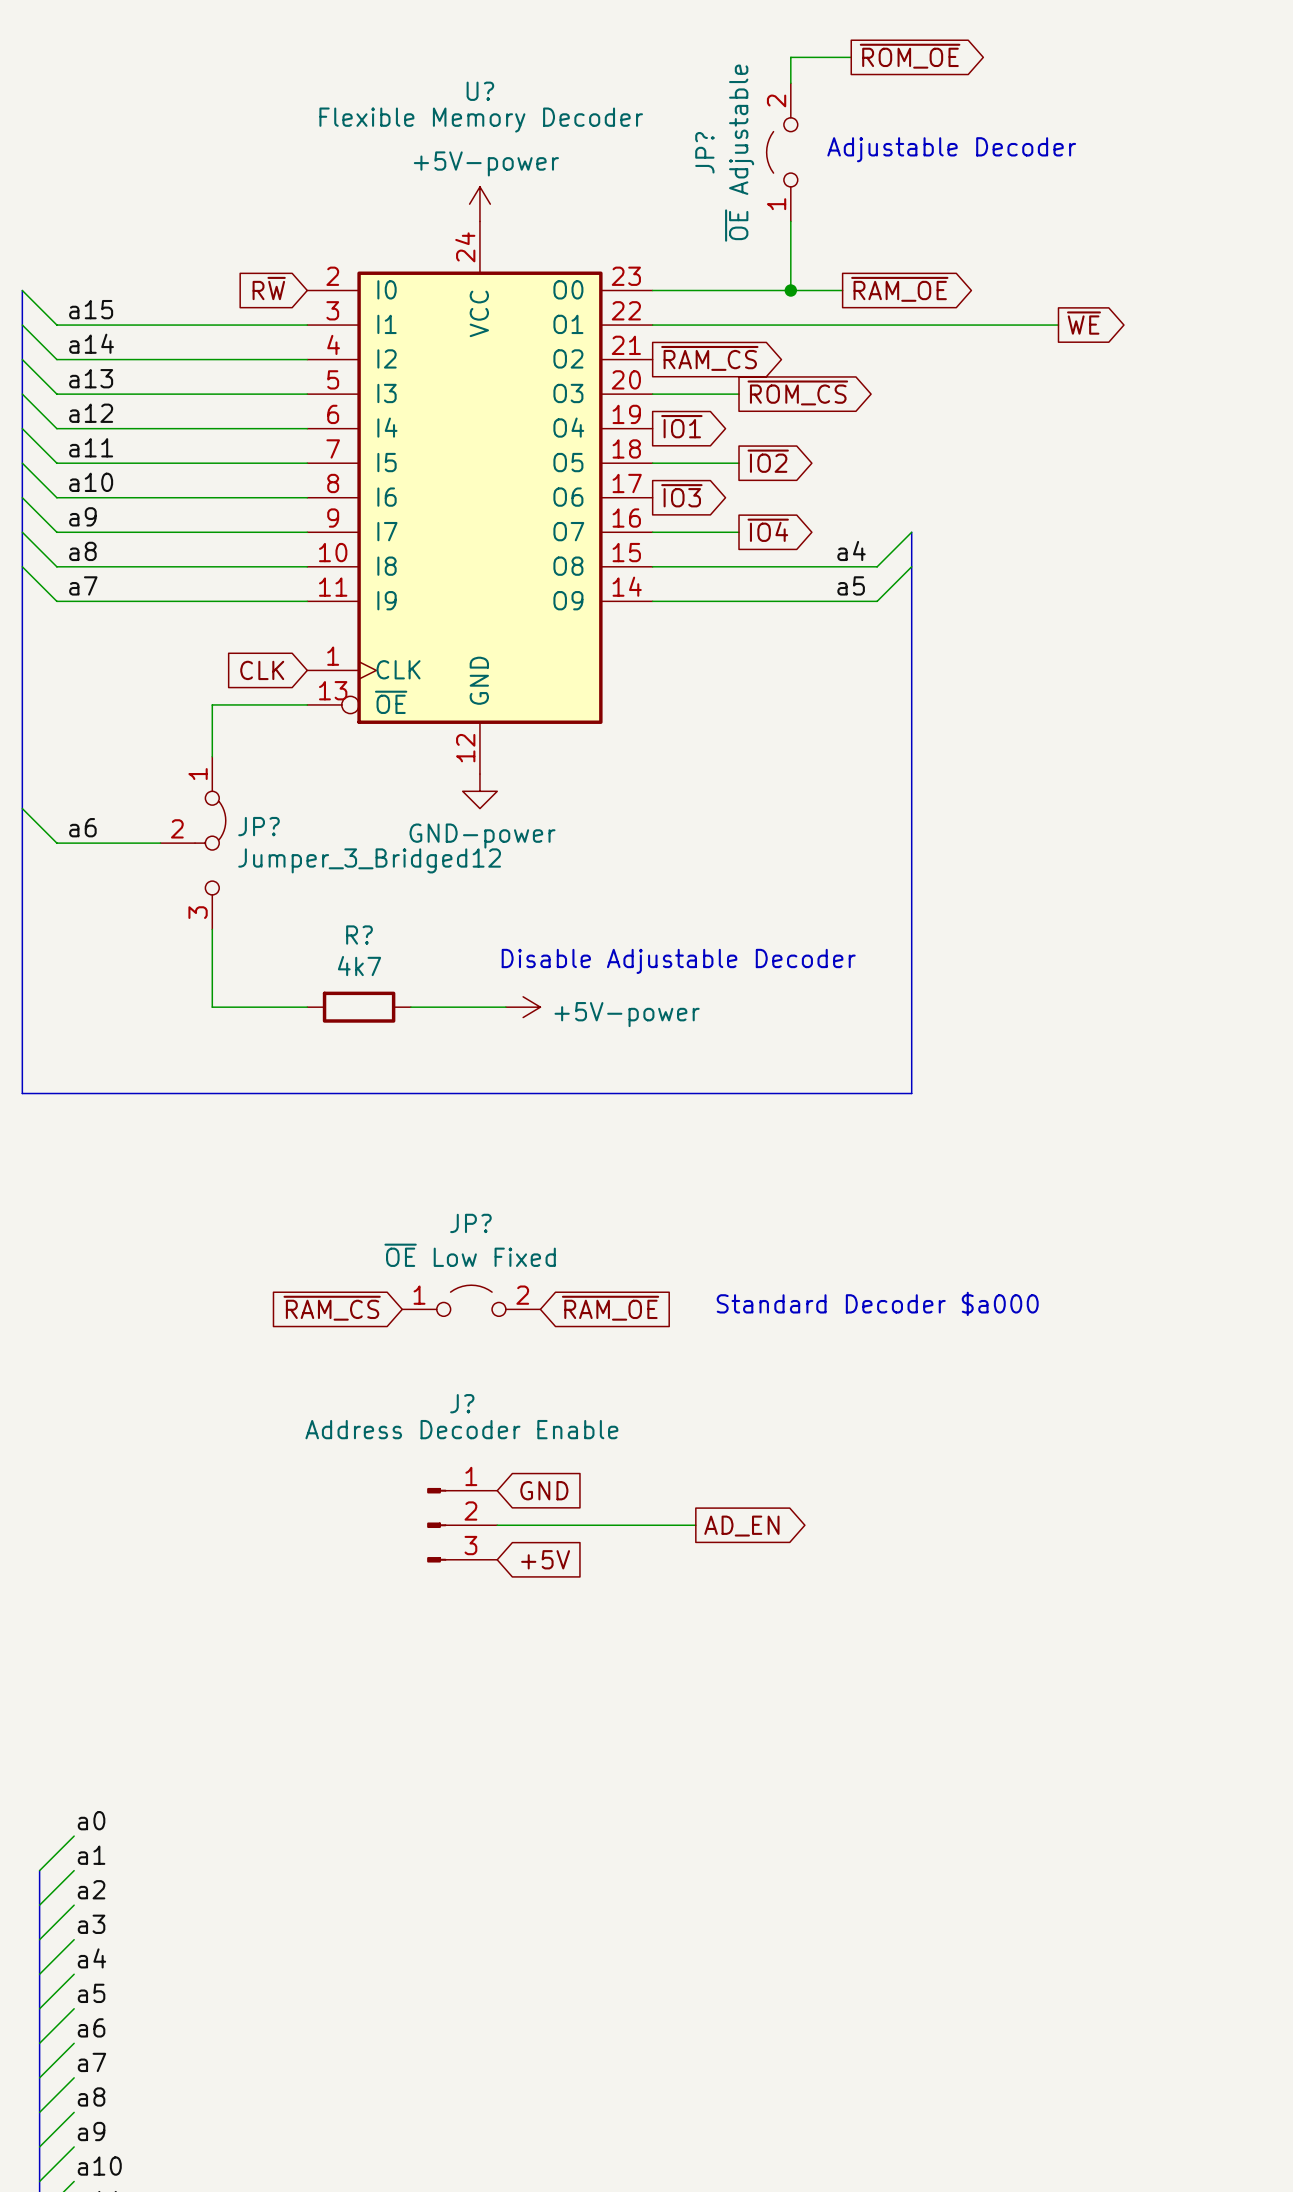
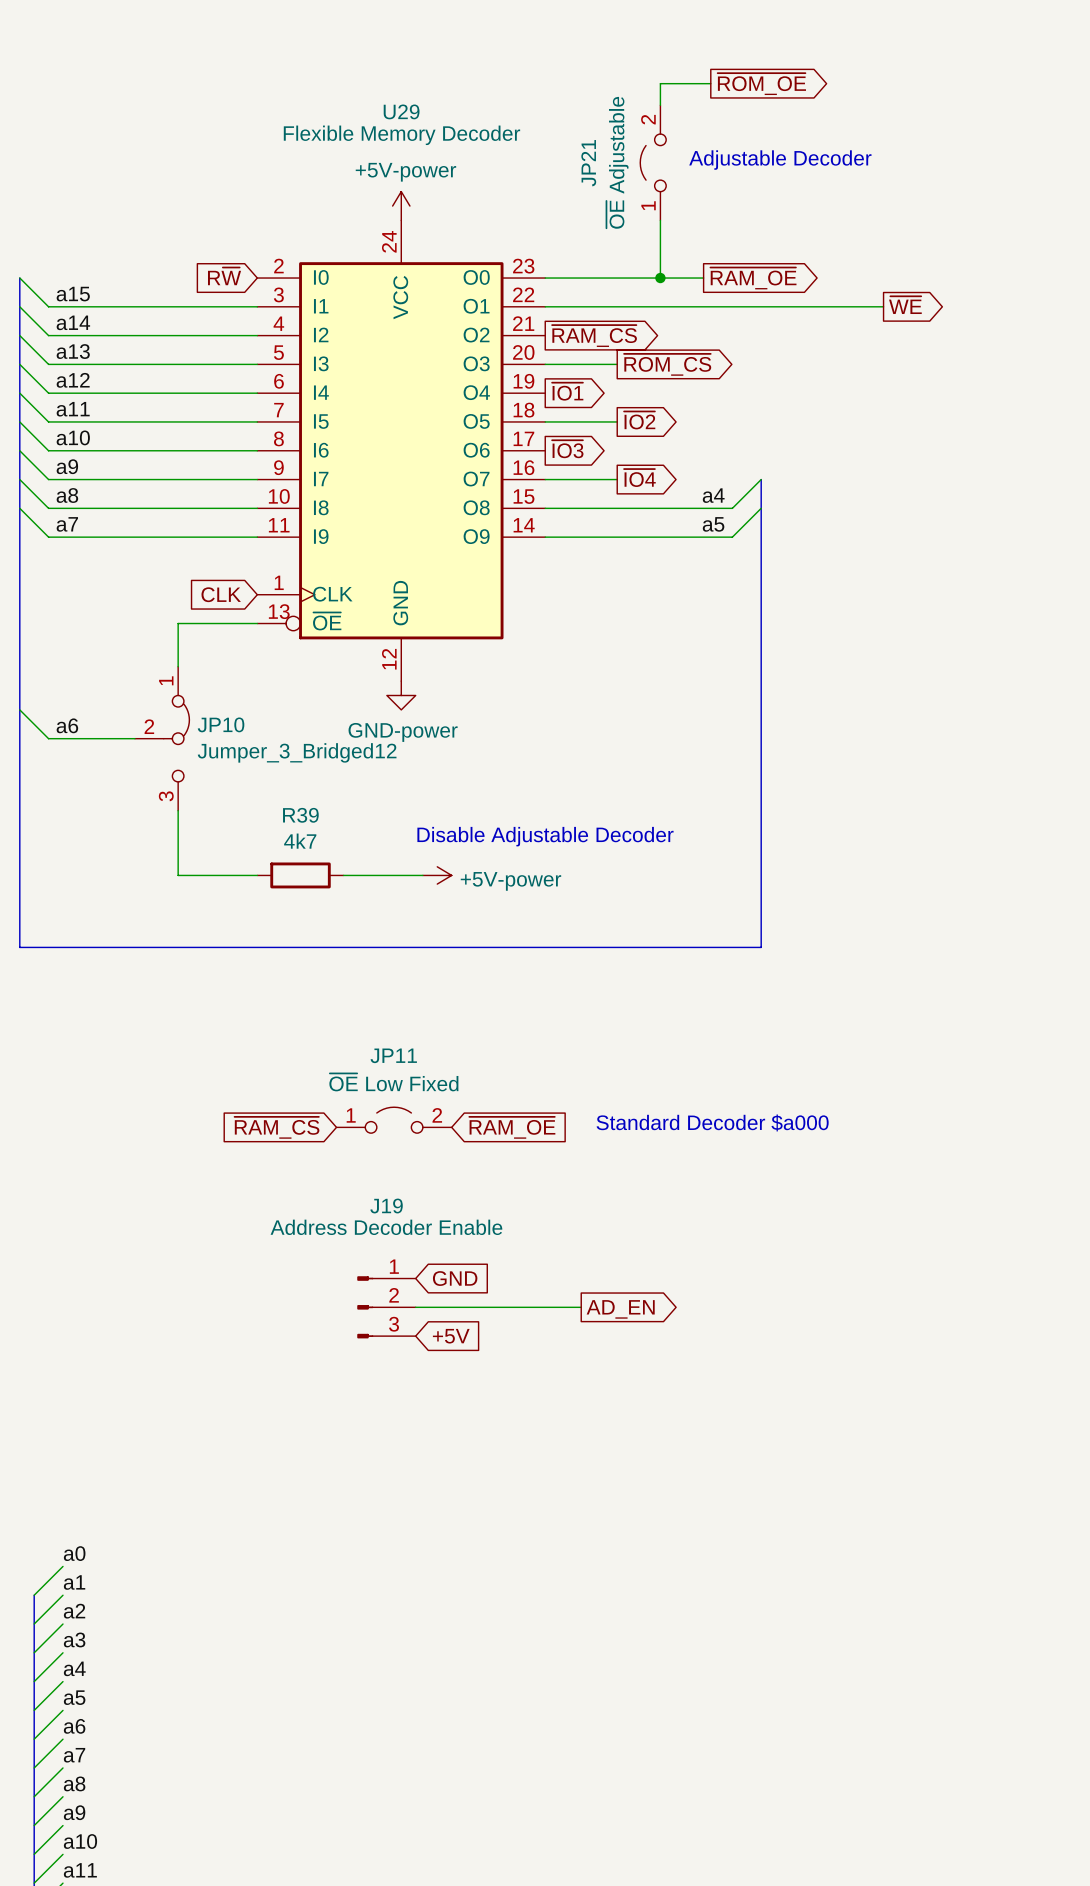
U? name: U? (480, 91) -> U29 (401, 111)
JP? name: JP? (704, 152) -> JP21 (588, 163)
JP? name: JP? (259, 826) -> JP10 (221, 724)
R? name: R? (359, 935) -> R39 (300, 815)
JP? name: JP? (470, 1223) -> JP11 (393, 1055)
J? name: J? (462, 1403) -> J19 (386, 1206)

